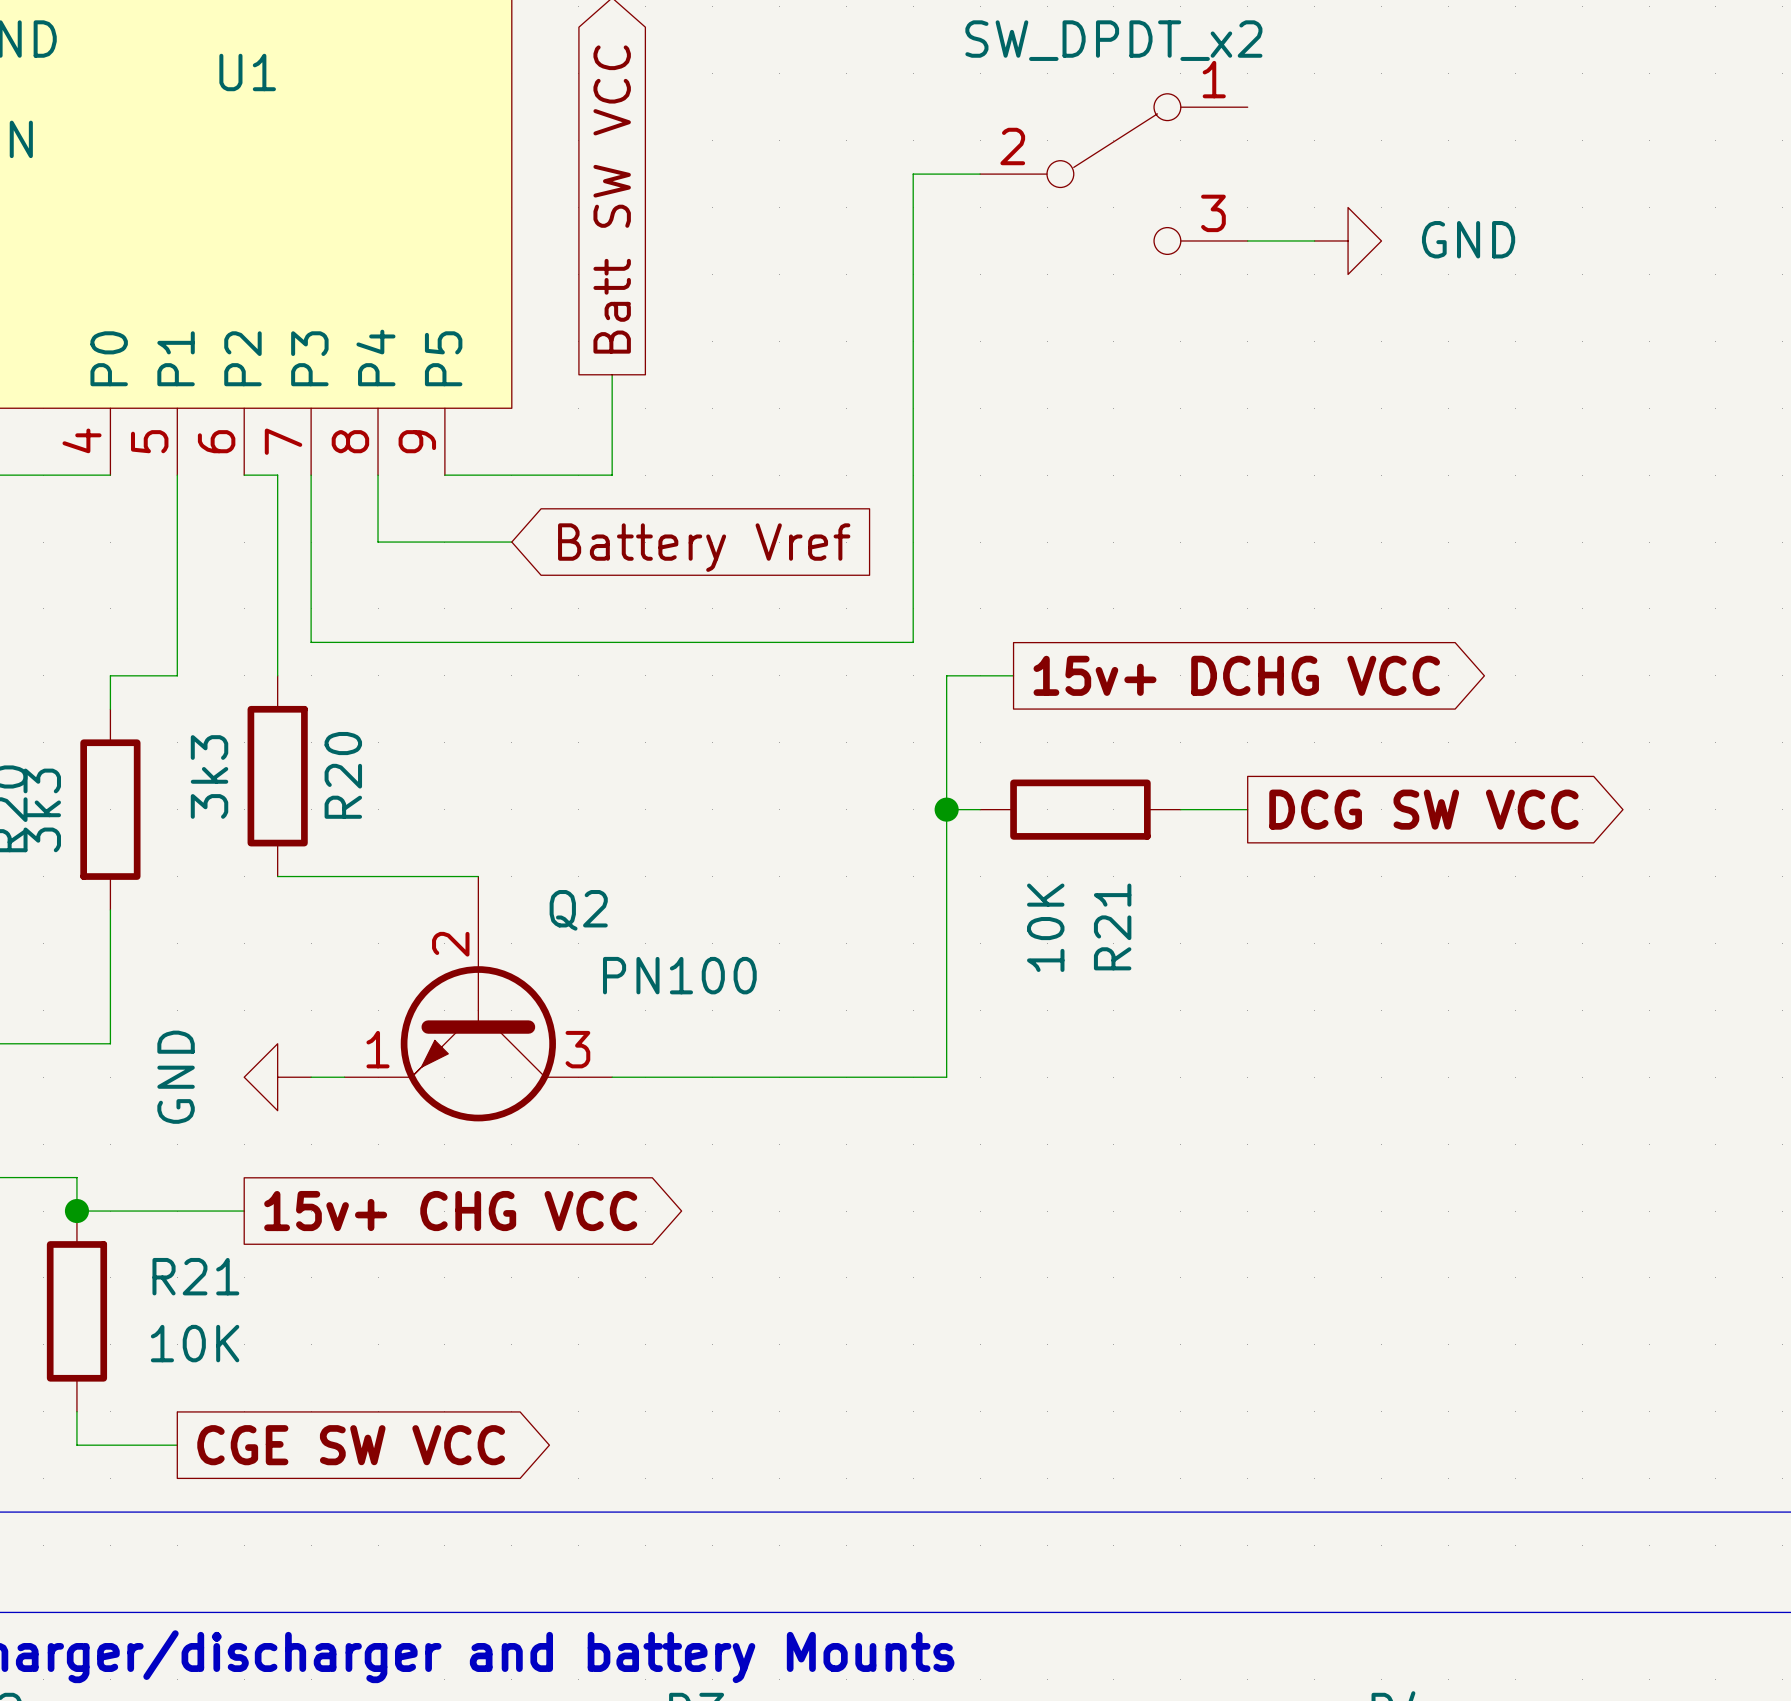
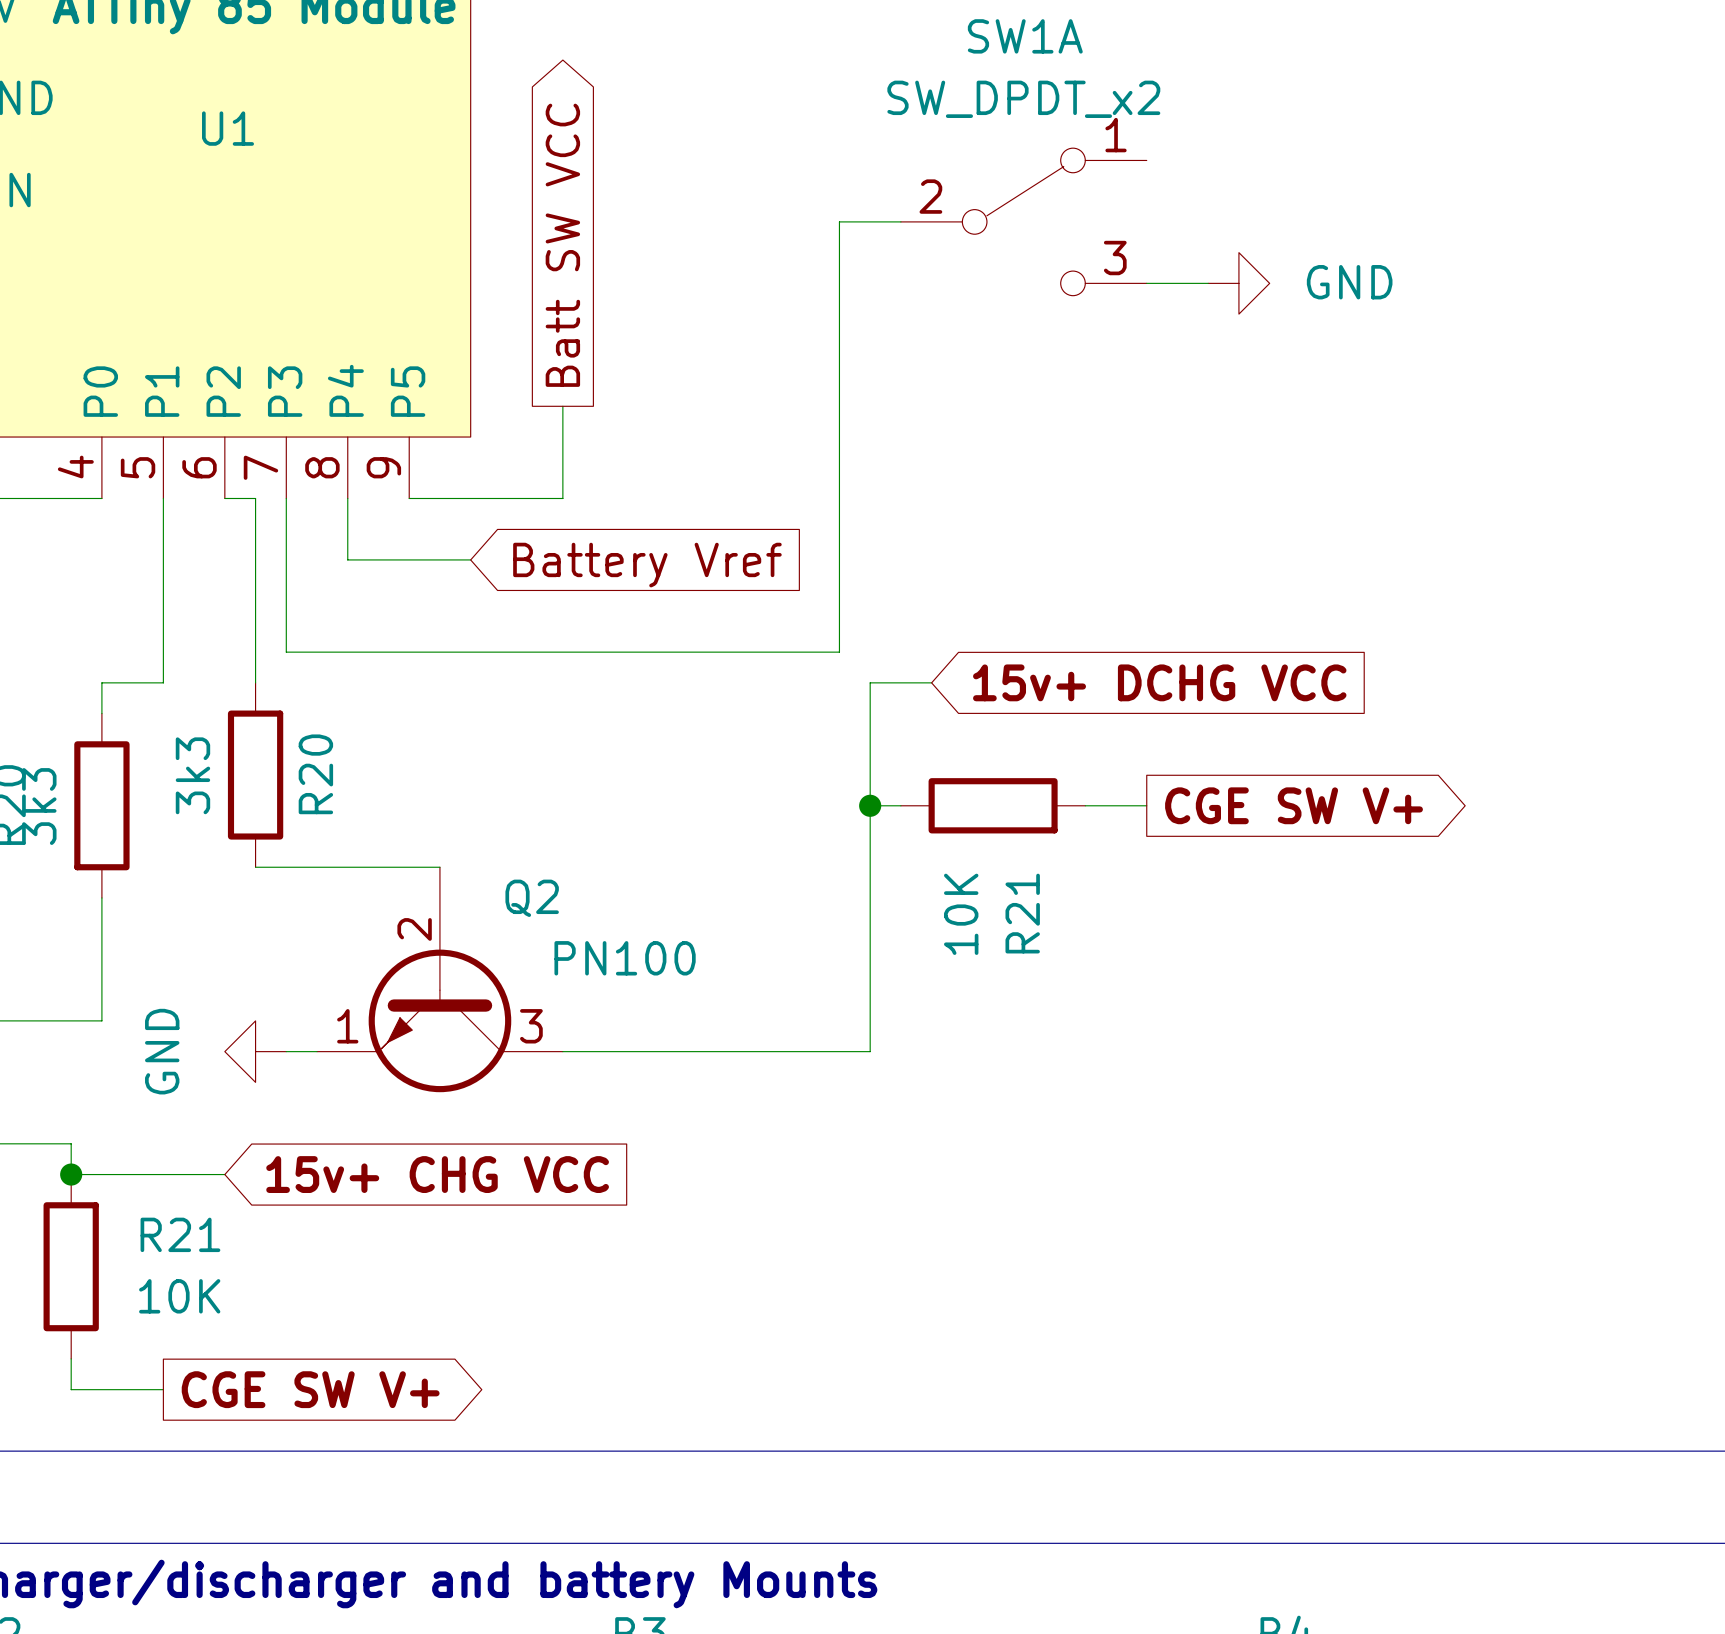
global label shape: output (1236, 675) -> input (1159, 682)
global label: DCG SW VCC (1423, 809) -> CGE SW V+ (1294, 805)
global label shape: output (450, 1211) -> input (437, 1174)
global label: CGE SW VCC (351, 1445) -> CGE SW V+ (310, 1389)

